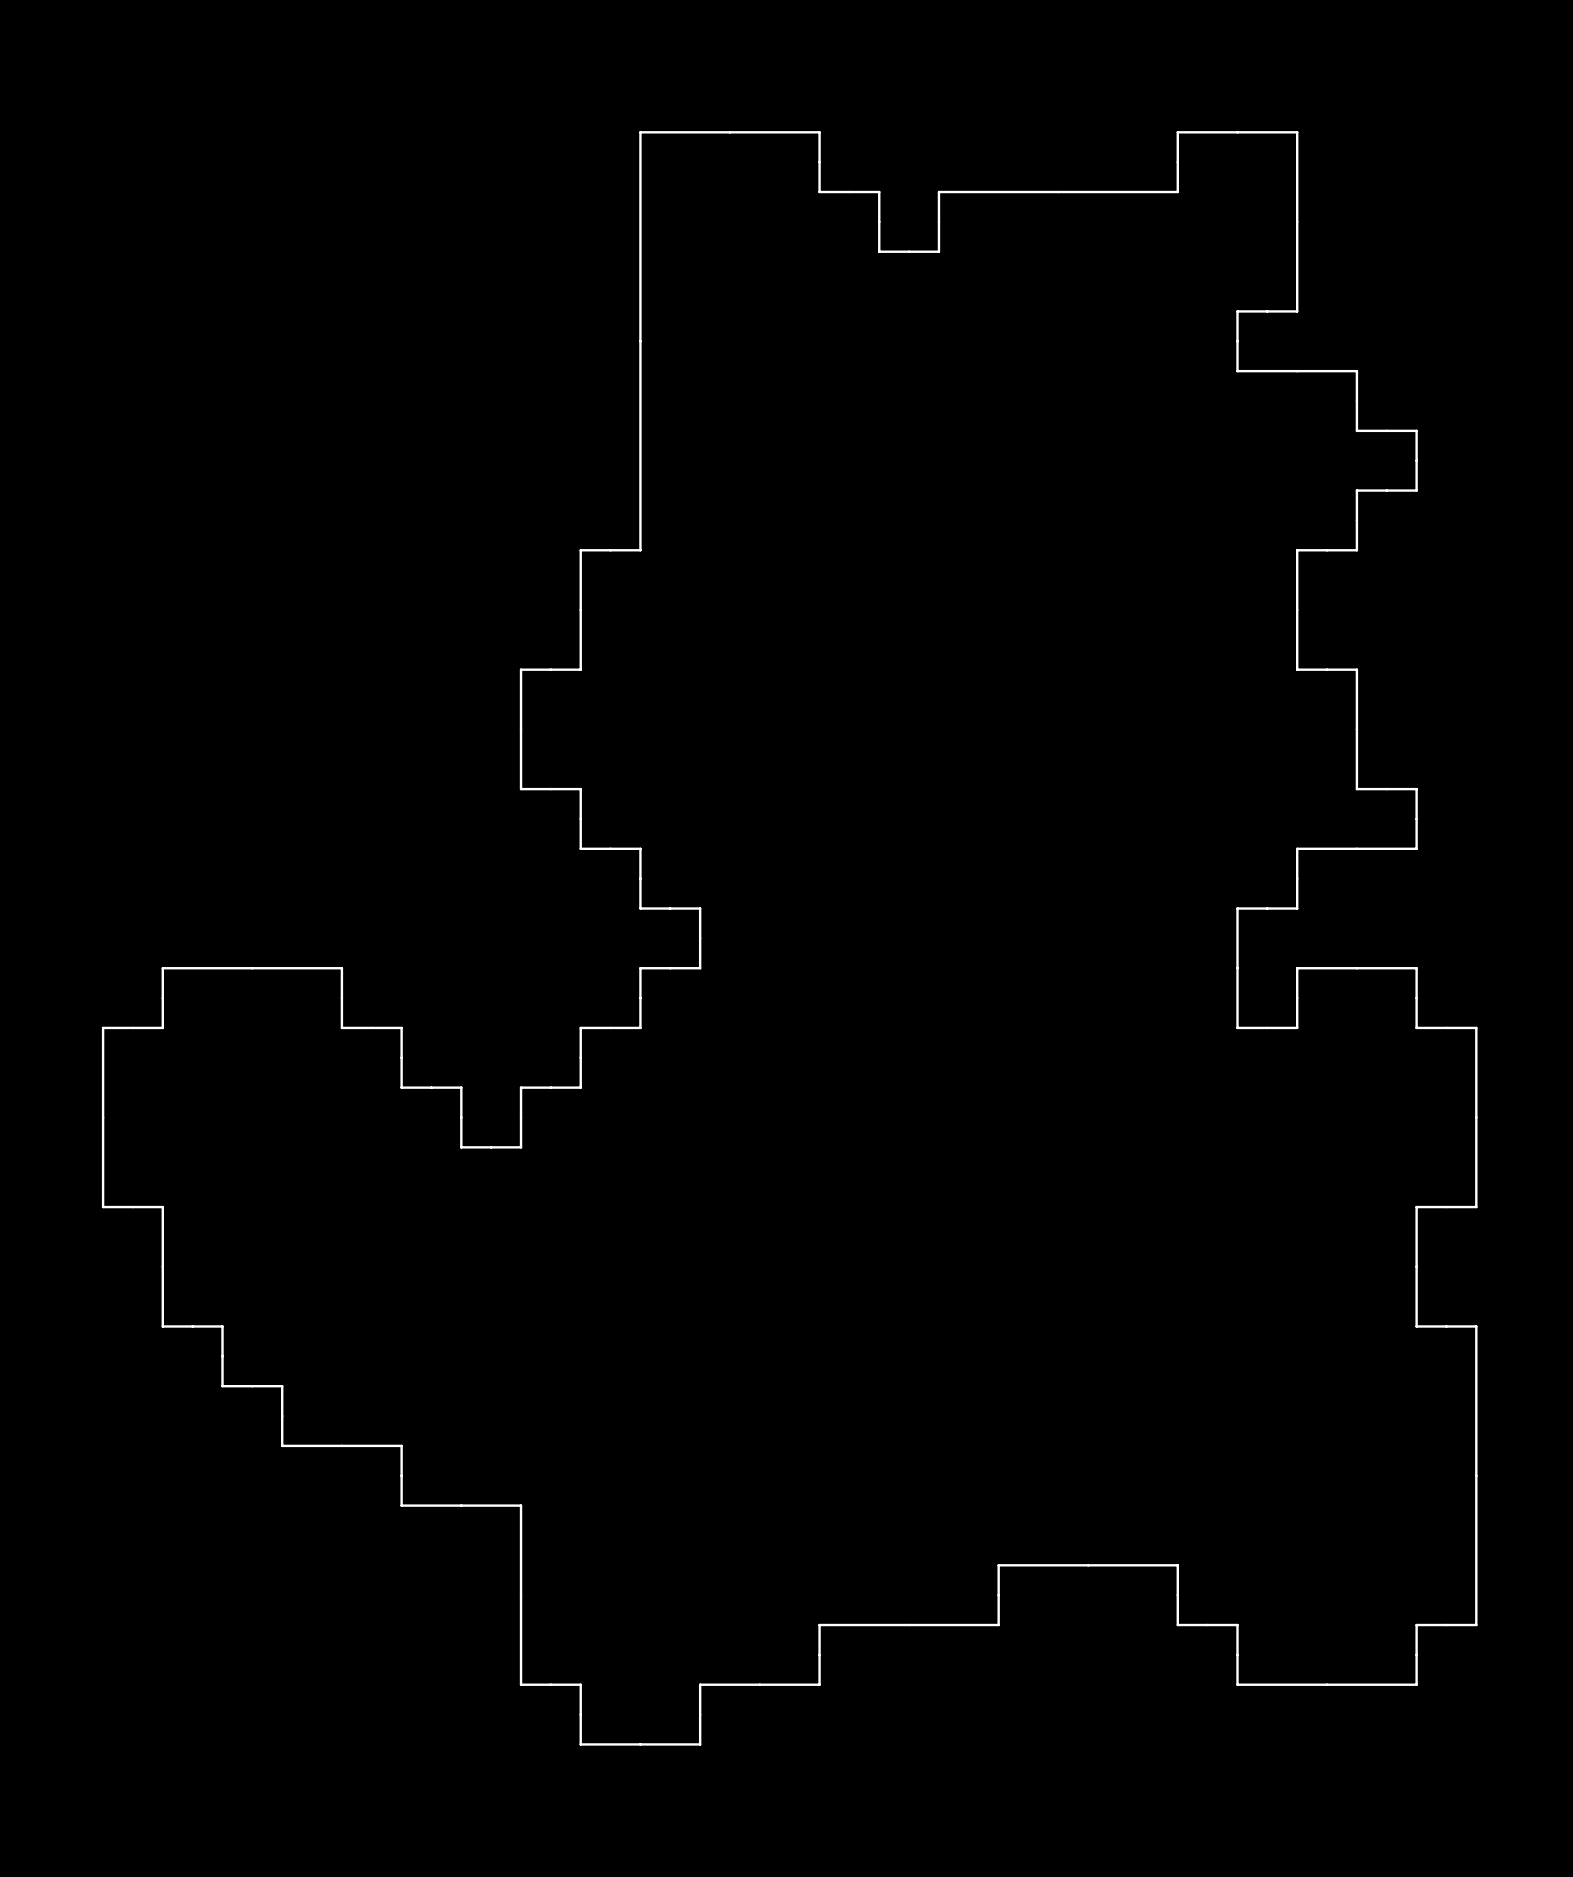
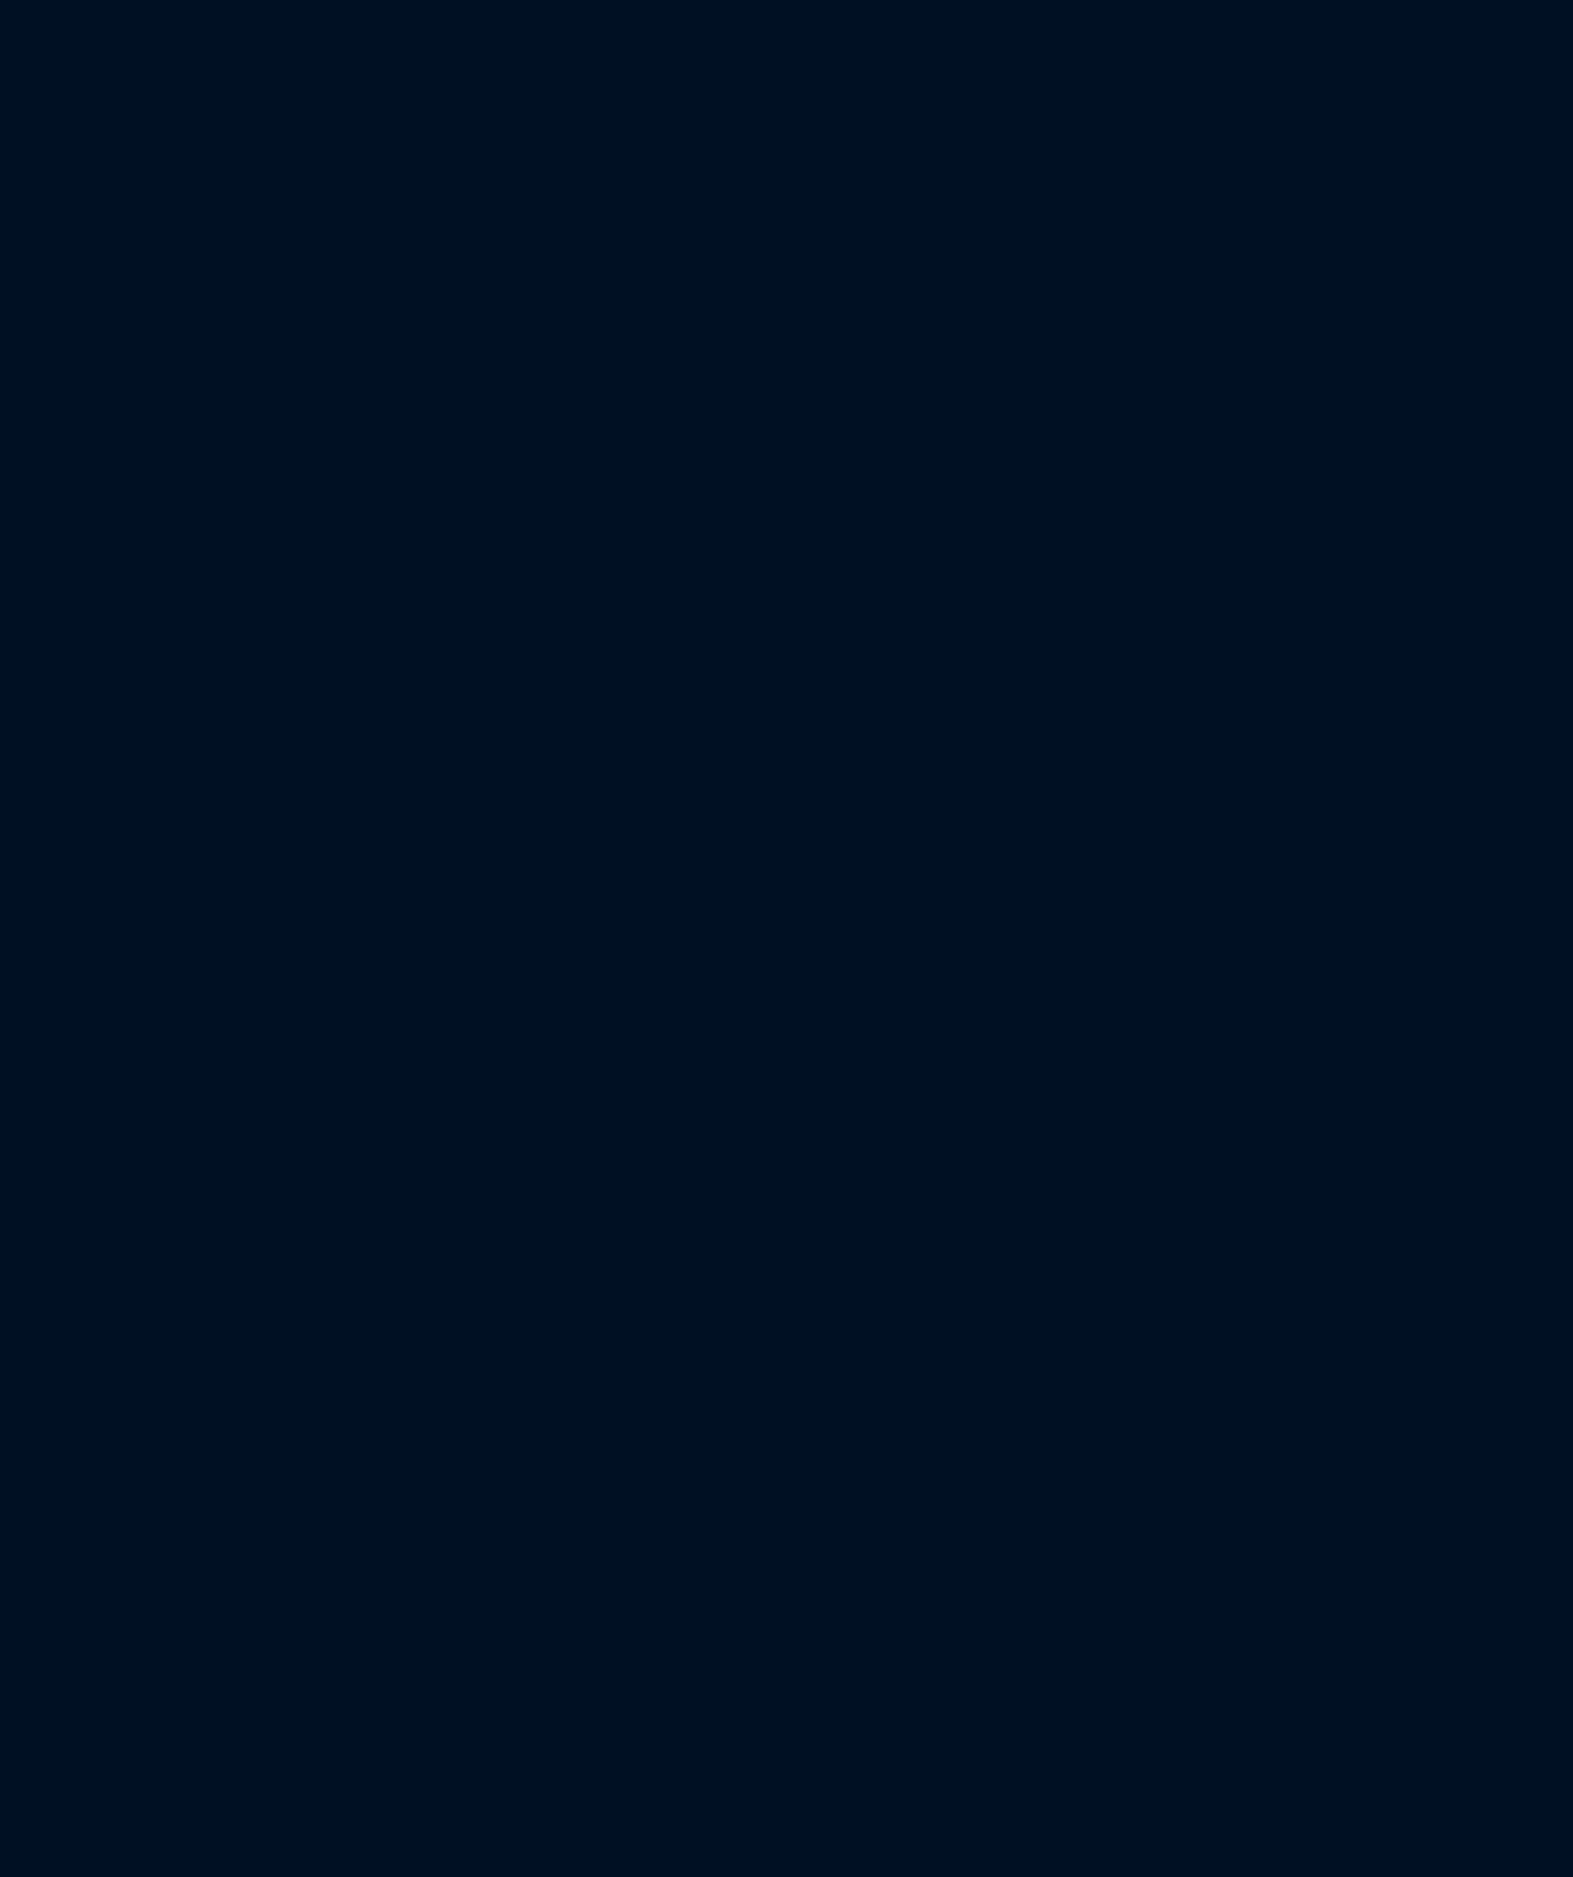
board edge: (640, 132) (640, 550) (580, 550) (580, 669) (521, 669) (521, 789) (580, 789) (580, 848) (640, 848) (640, 908) (700, 908) (700, 968) (640, 968) (640, 1027) (580, 1027) (580, 1087) (521, 1087) (521, 1147) (461, 1147) (461, 1087) (401, 1087) (401, 1027) (341, 1027) (341, 968) (162, 968) (162, 1027) (103, 1027) (103, 1207) (162, 1207) (162, 1326) (222, 1326) (222, 1386) (282, 1386) (282, 1445) (401, 1445) (401, 1505) (521, 1505) (521, 1684) (580, 1684) (580, 1744) (700, 1744) (700, 1684) (819, 1684) (819, 1625) (998, 1625) (998, 1565) (1177, 1565) (1177, 1625) (1237, 1625) (1237, 1684) (1416, 1684) (1416, 1625) (1476, 1625) (1476, 1326) (1416, 1326) (1416, 1207) (1476, 1207) (1476, 1027) (1416, 1027) (1416, 968) (1297, 968) (1297, 1027) (1237, 1027) (1237, 908) (1297, 908) (1297, 848) (1416, 848) (1416, 789) (1356, 789) (1356, 669) (1297, 669) (1297, 550) (1356, 550) (1356, 490) (1416, 490) (1416, 430) (1356, 430) (1356, 371) (1237, 371) (1237, 311) (1297, 311) (1297, 132) (1177, 132) (1177, 192) (938, 192) (938, 251) (879, 251) (879, 192) (819, 192) (819, 132) (640, 132) -> none

